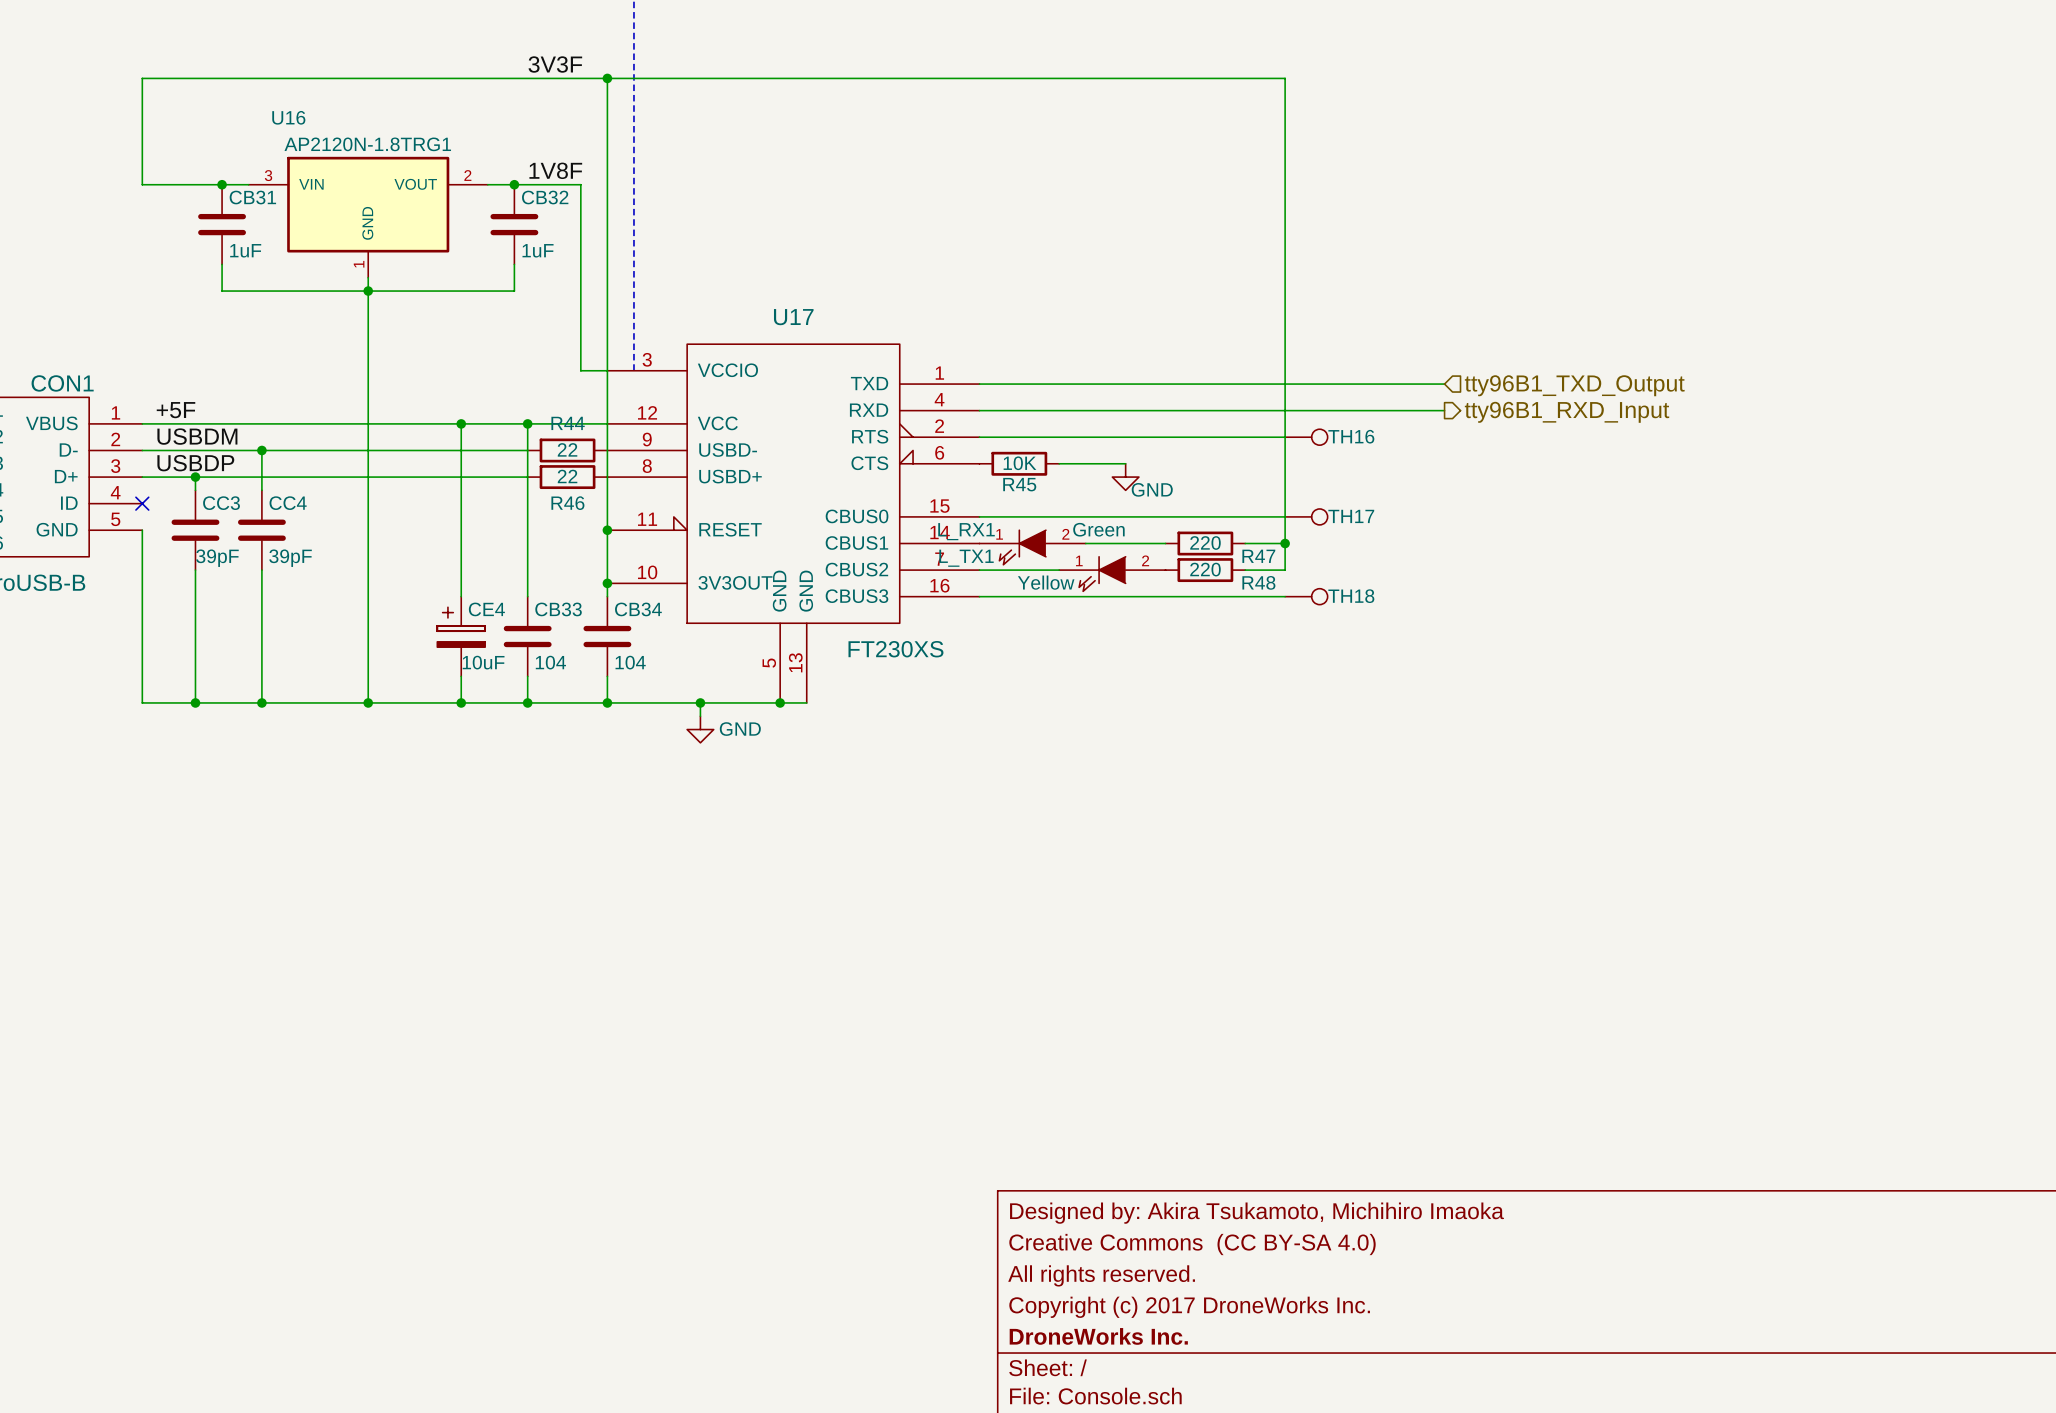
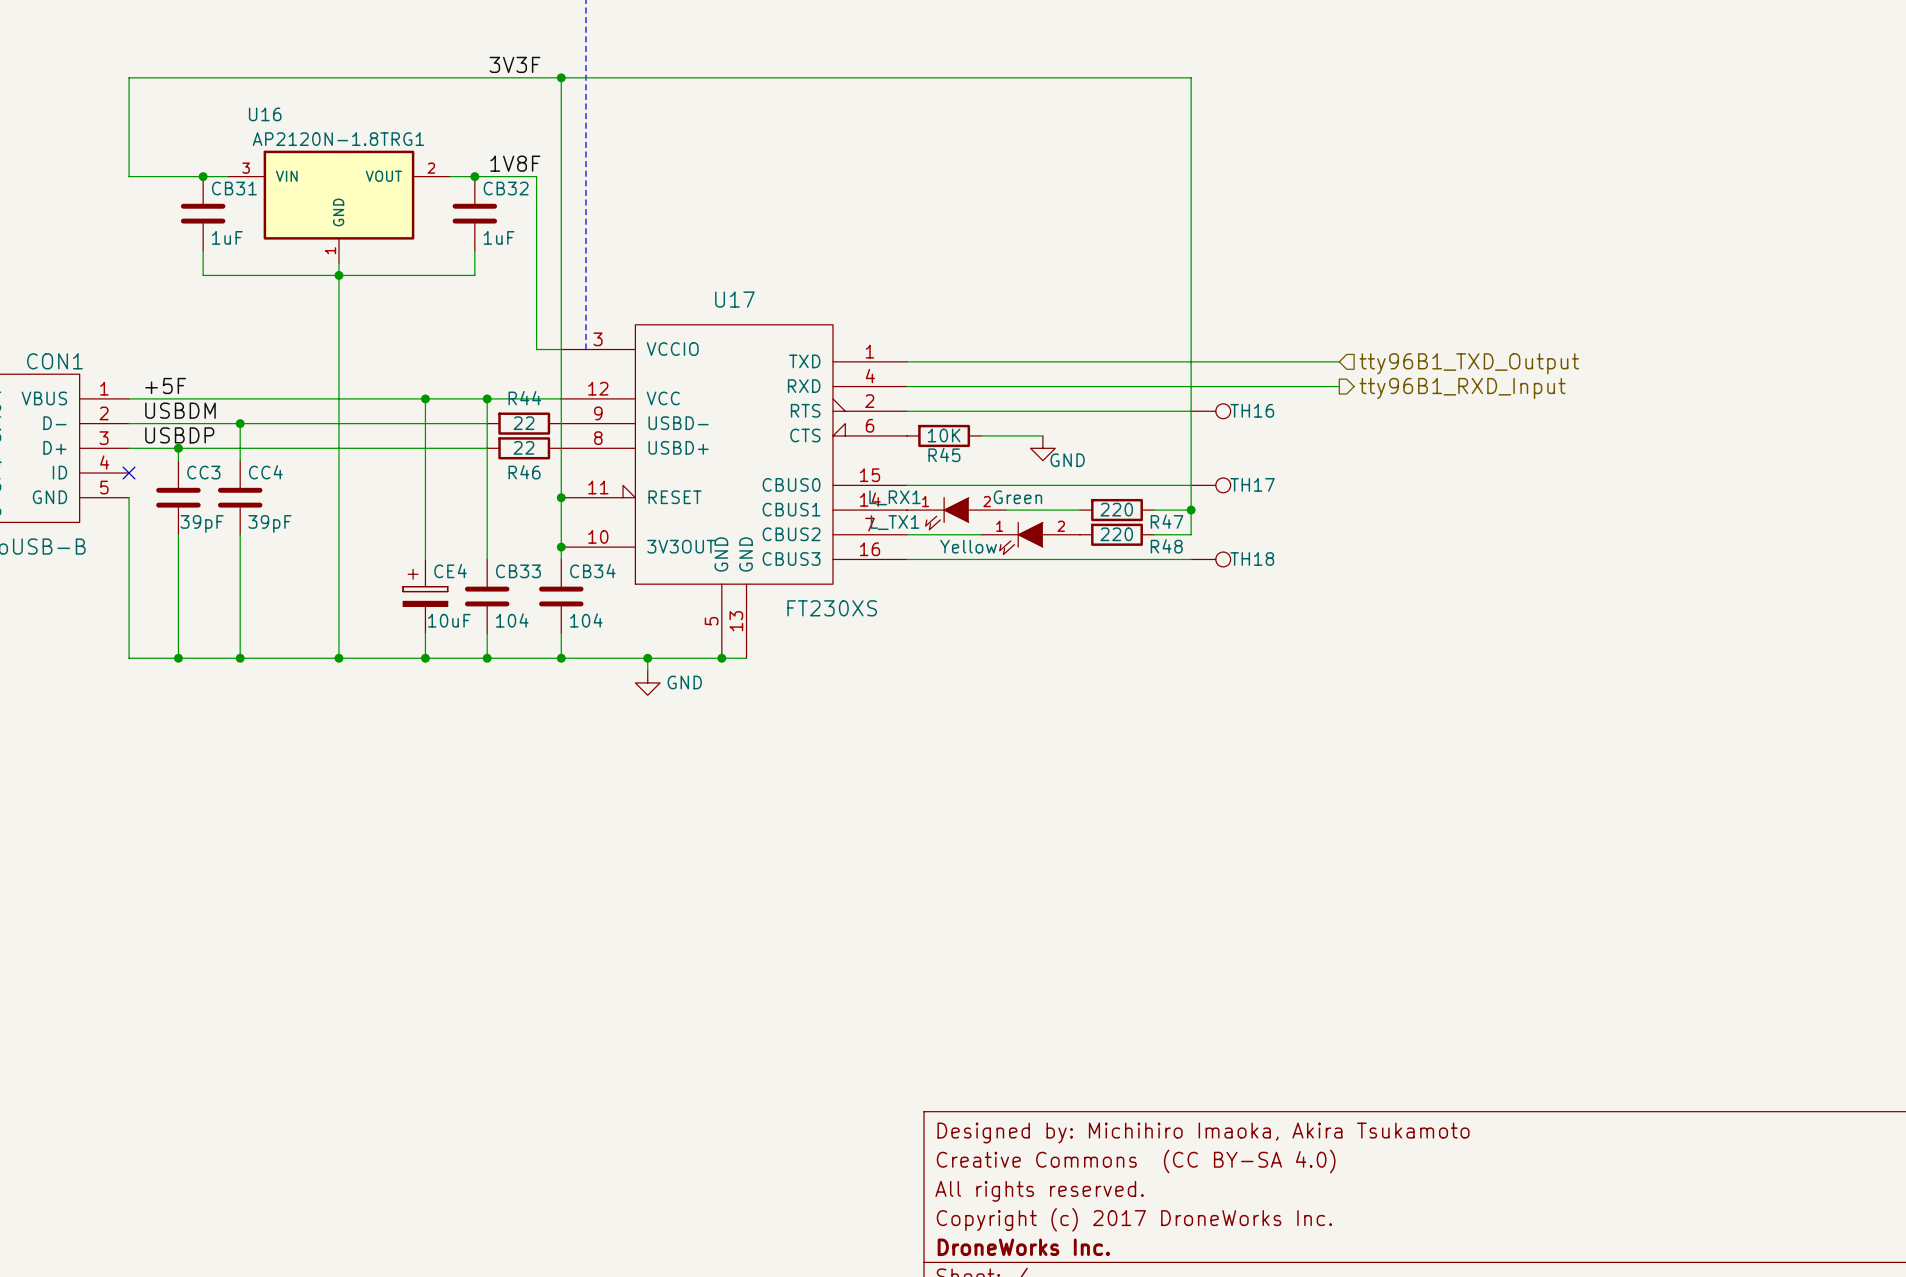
title block: Designed by: Akira Tsukamoto, Michihiro Imaoka (1256, 1213) -> Designed by: Michihiro Imaoka, Akira Tsukamoto (1203, 1133)

